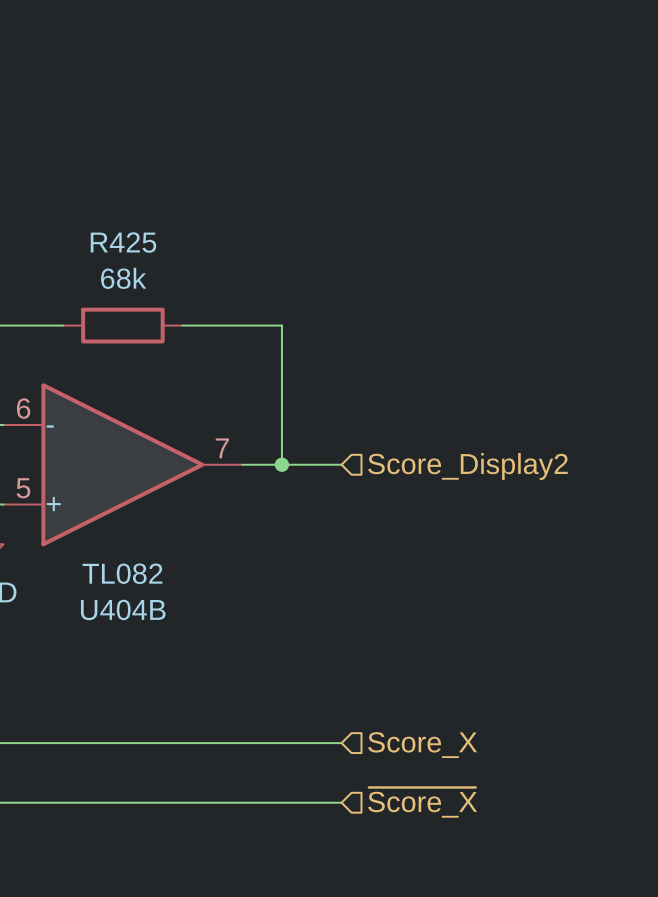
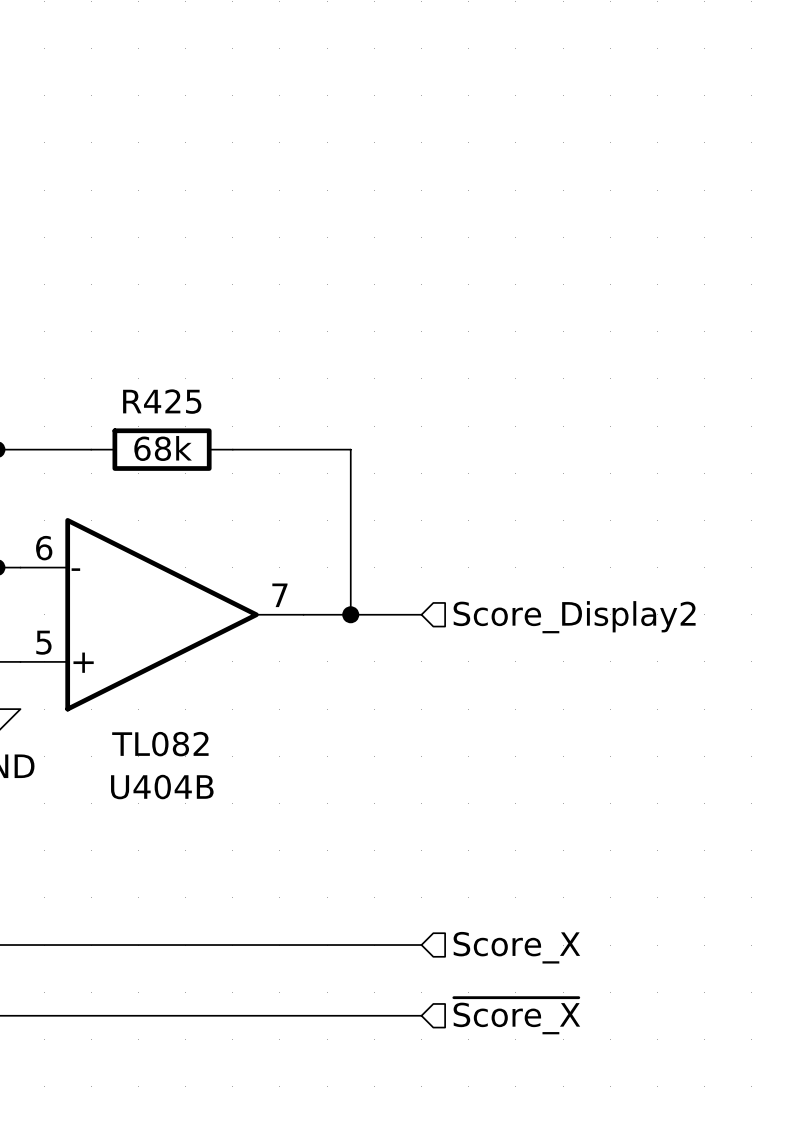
R425 name position: R425 (123, 242) -> R425 (162, 401)
R425 value position: 68k (123, 278) -> 68k (163, 448)

